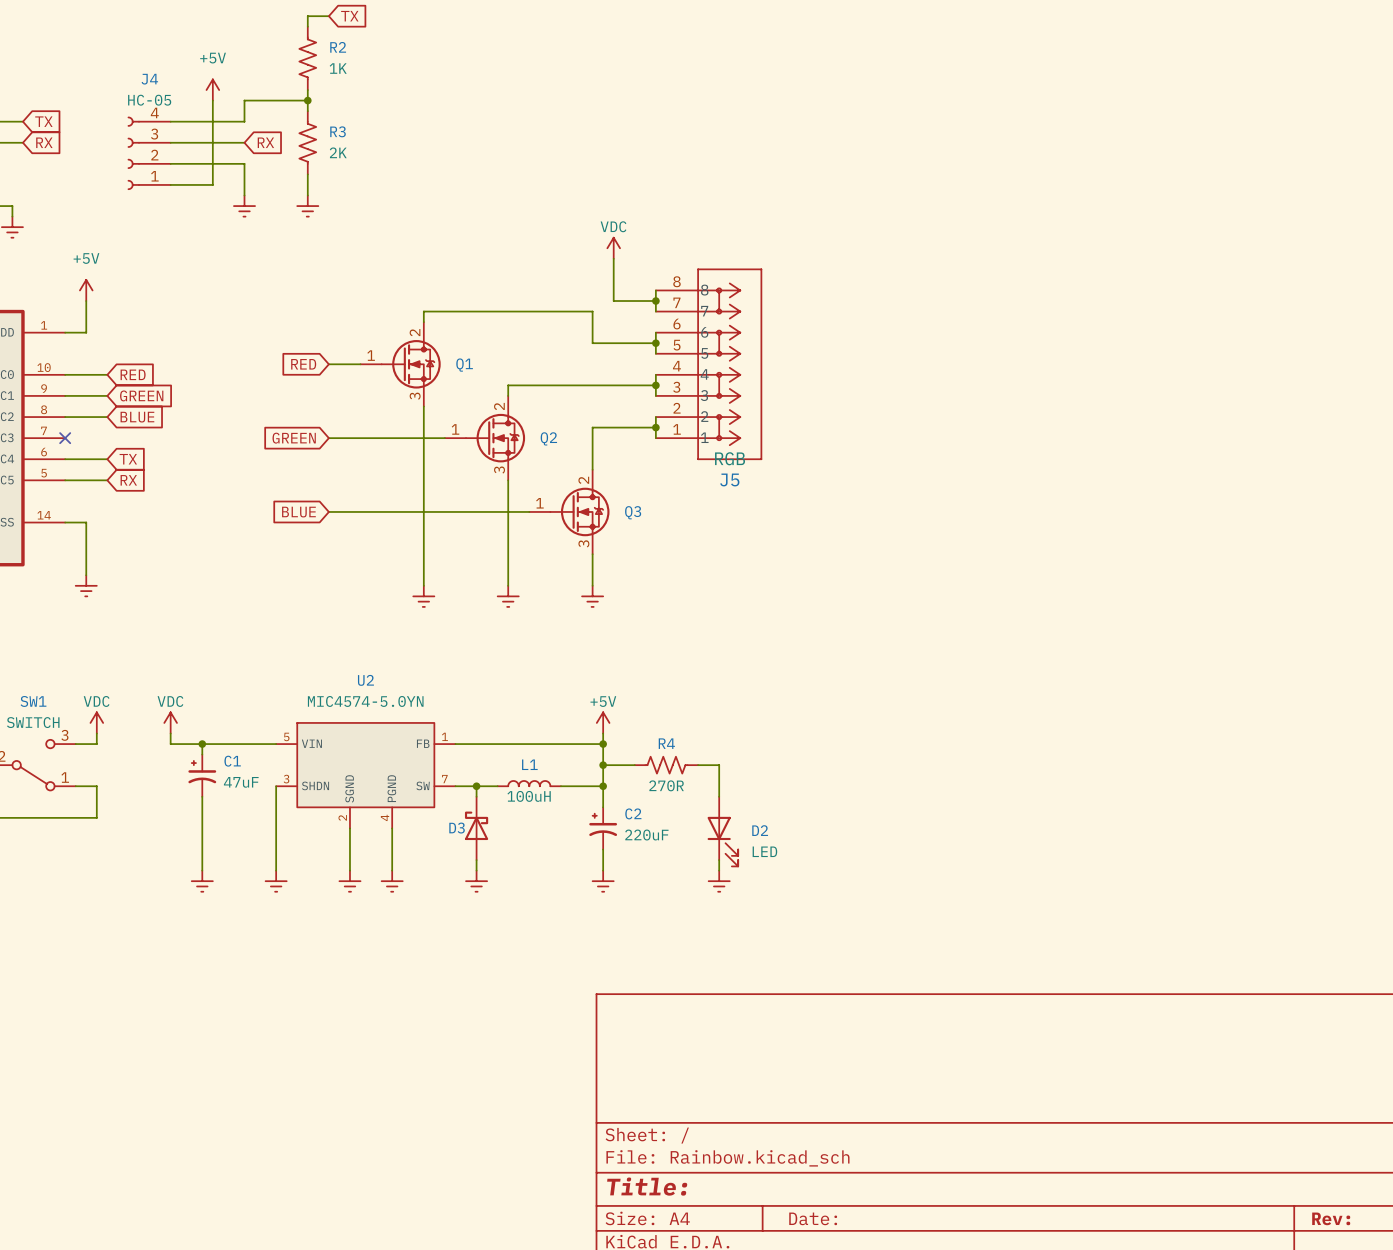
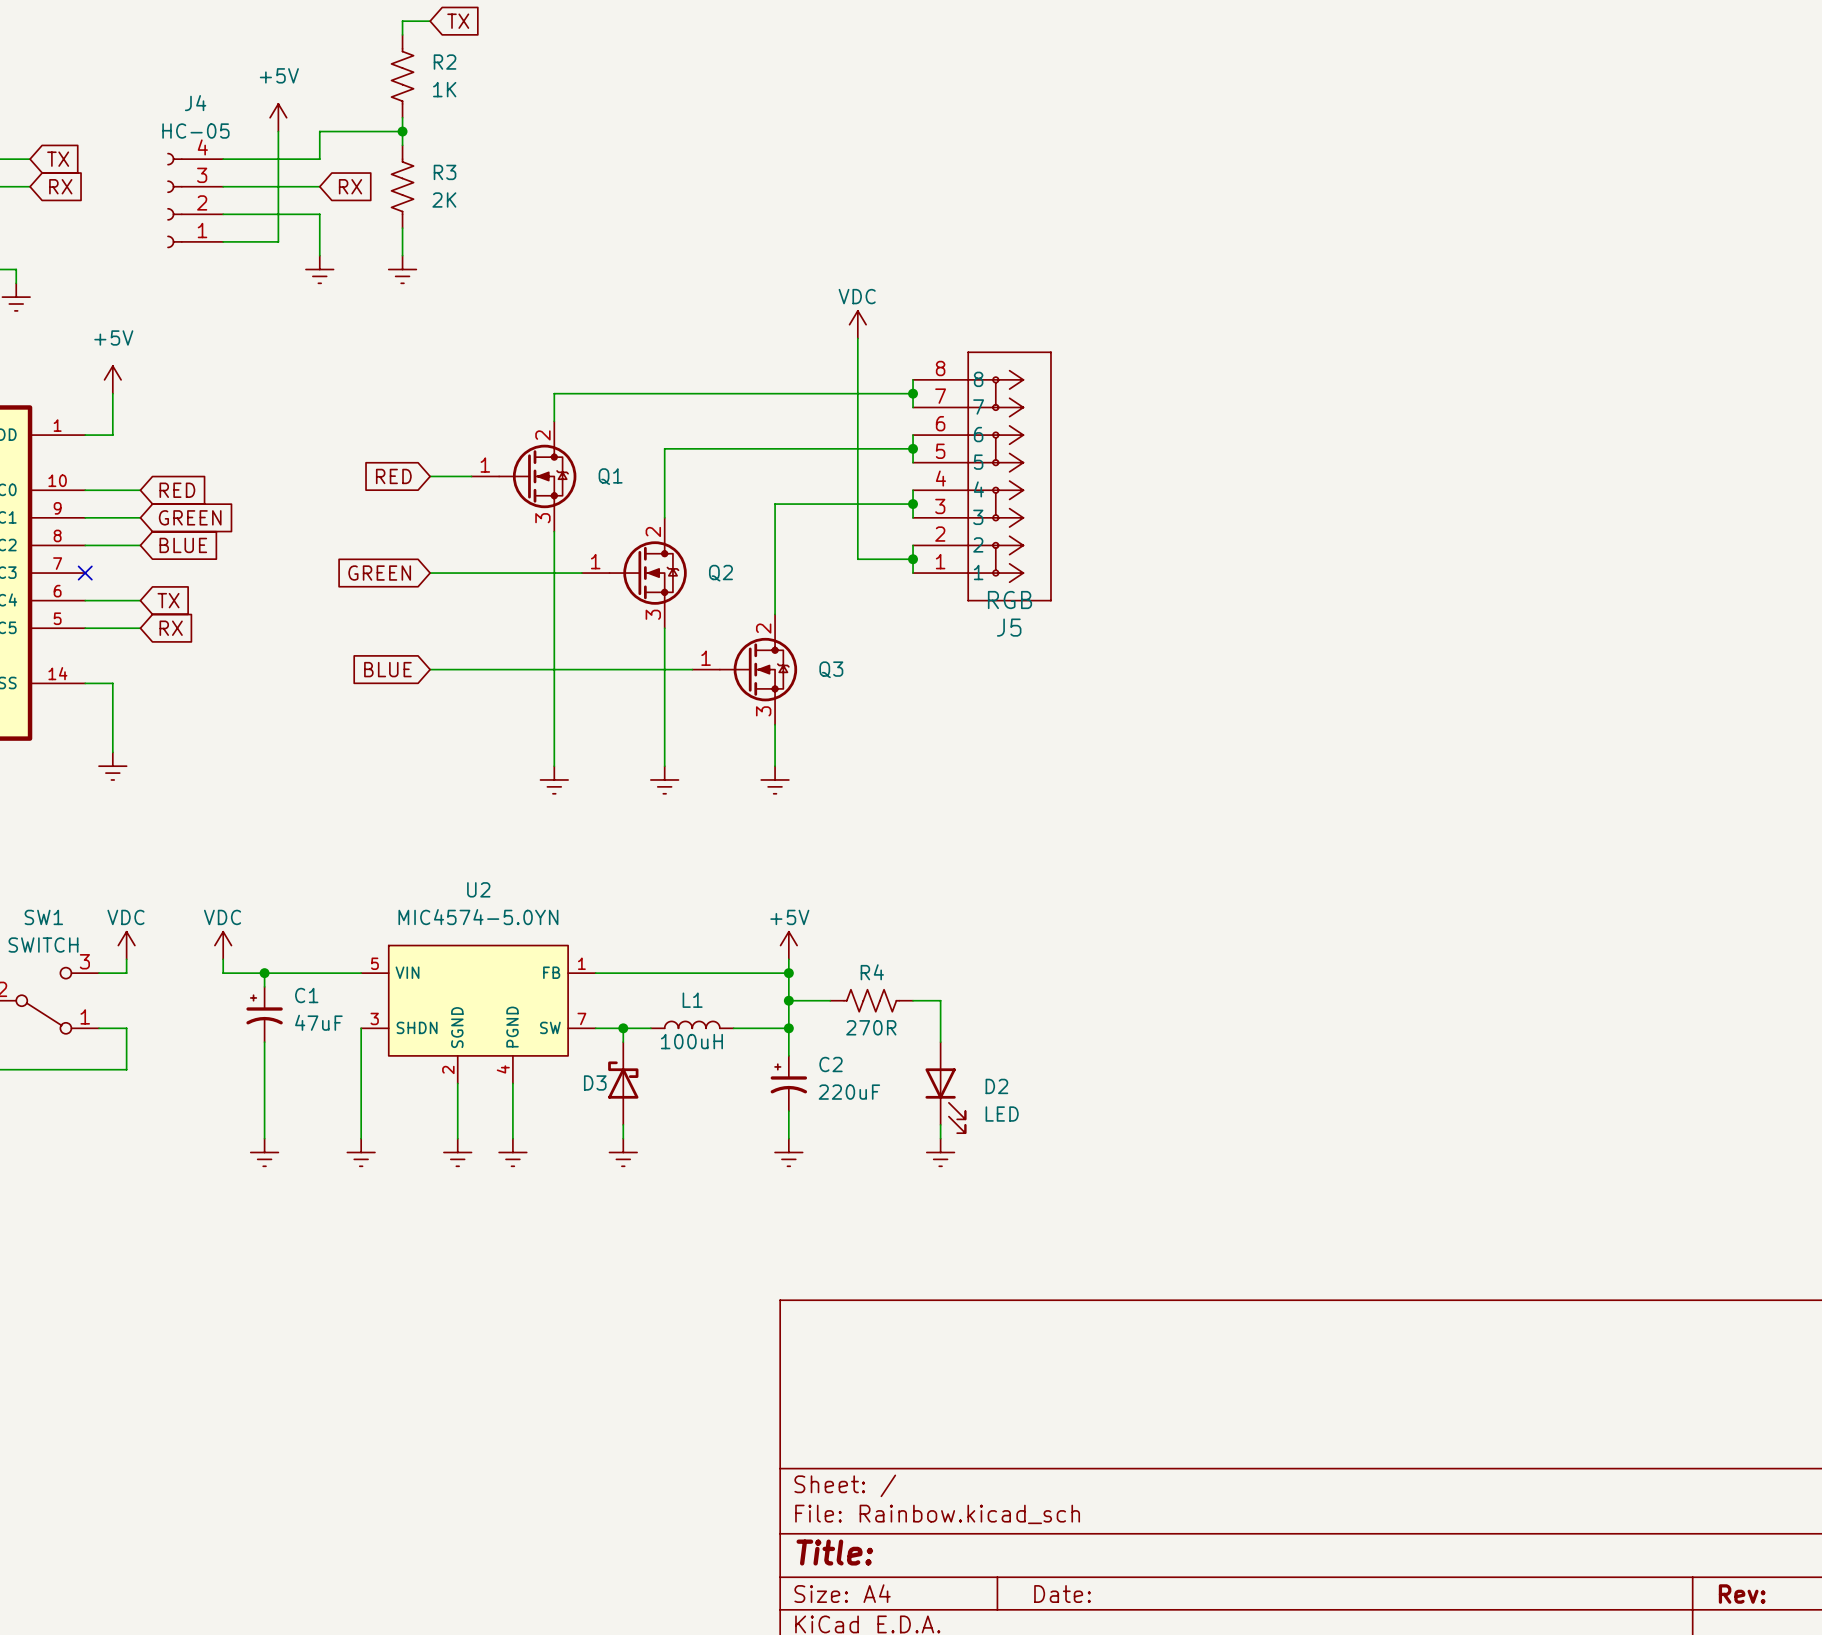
power symbol position: VDC (613, 248) -> VDC (857, 324)
wire: (613, 258) (613, 301) -> none
wire: none -> (857, 338) (857, 379)
wire: none -> (857, 393) (913, 393)
junction: (655, 301) -> none
junction: none -> (913, 393)
wire: (423, 311) (592, 311) (592, 343) -> (554, 407) (554, 393) (802, 393)
wire: none -> (857, 407) (857, 435)
wire: none -> (857, 448) (913, 448)
junction: (655, 343) -> none
junction: none -> (913, 448)
wire: none -> (857, 462) (857, 490)
J5 position: (708, 364) -> (982, 476)
wire: (508, 385) (592, 385) -> (664, 504) (664, 448) (775, 448)
wire: none -> (857, 504) (913, 504)
junction: (655, 385) -> none
junction: none -> (913, 504)
wire: none -> (857, 517) (857, 545)
wire: (592, 427) (655, 427) (655, 438) -> (775, 559) (775, 504)
wire: none -> (857, 559) (913, 559)
junction: (655, 427) -> none
junction: none -> (913, 559)

